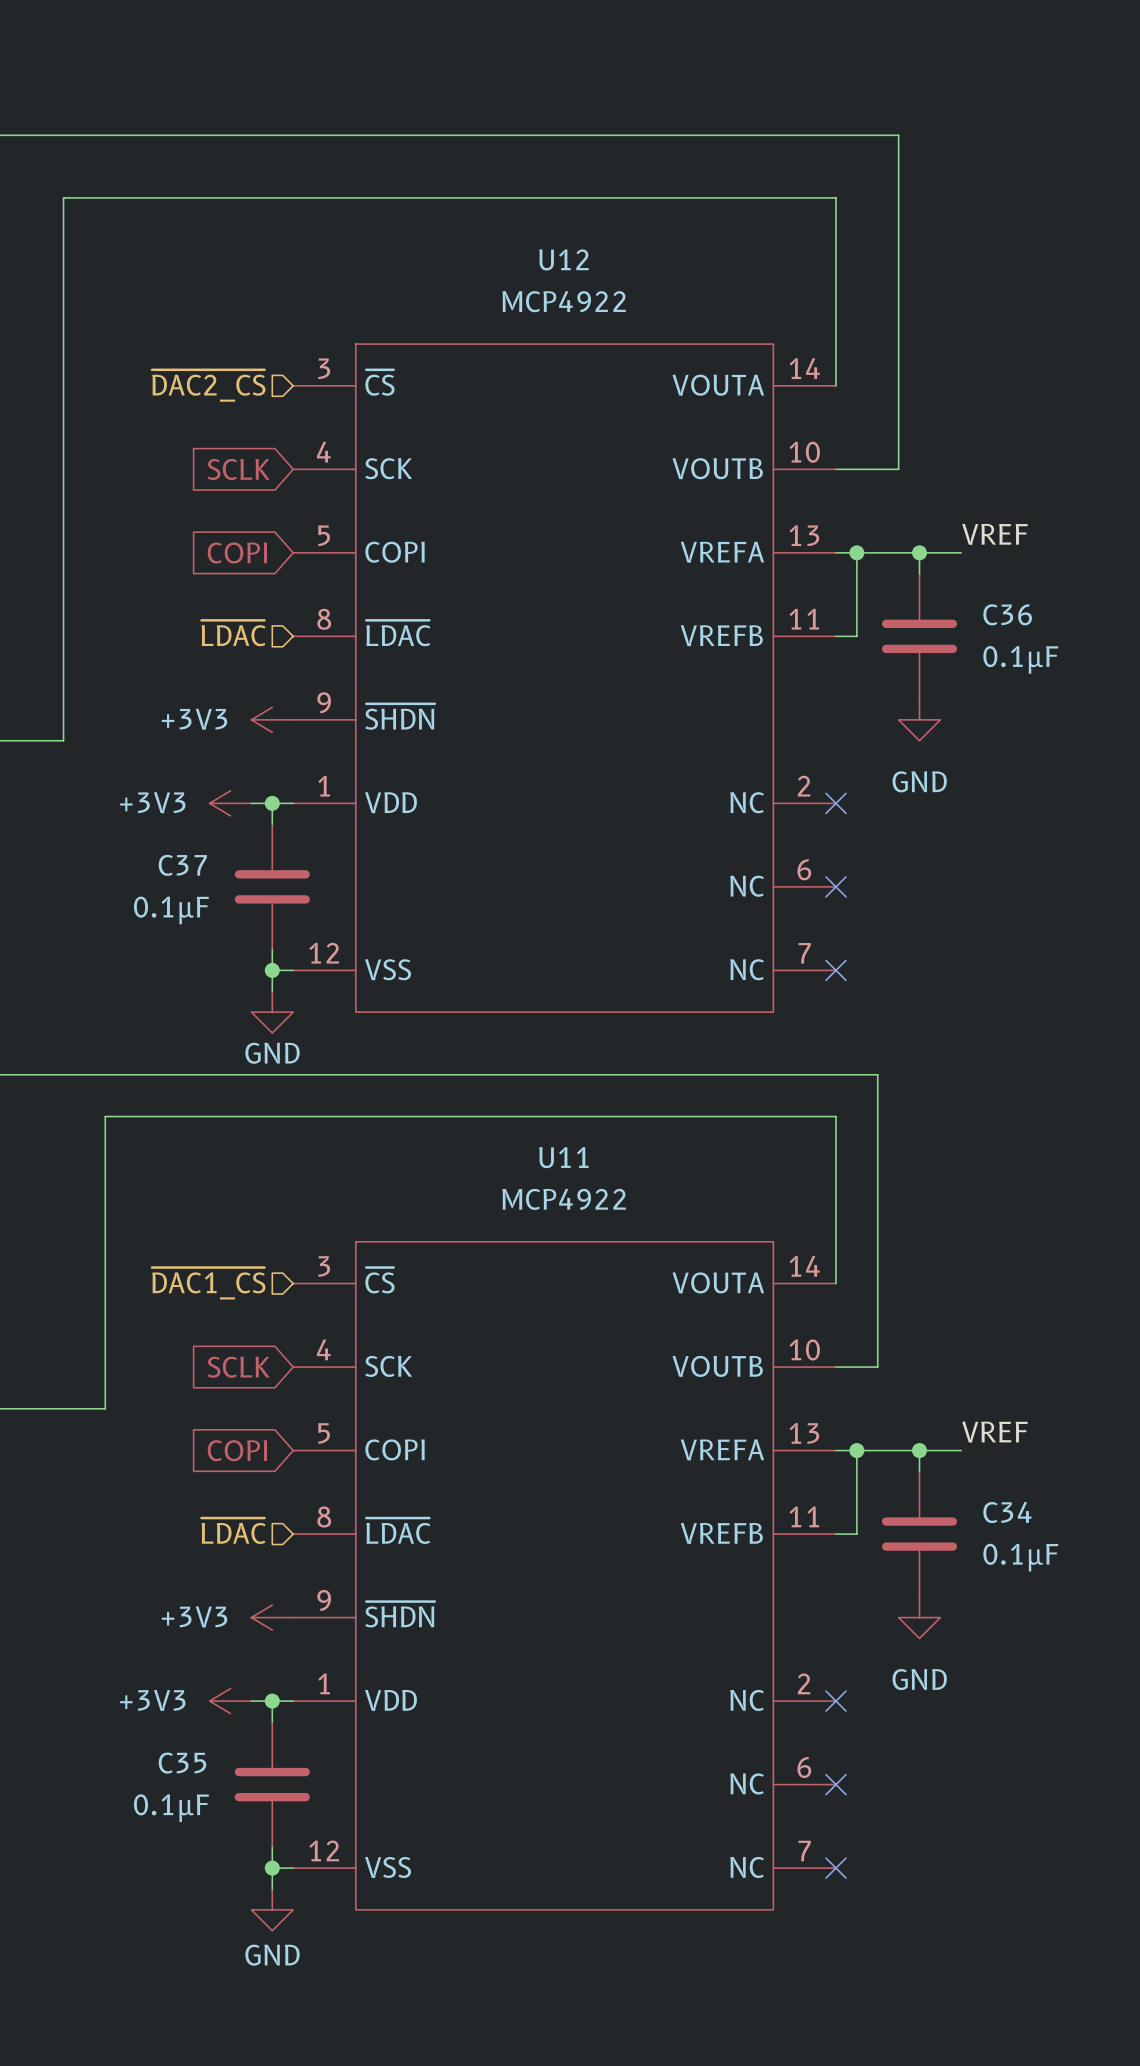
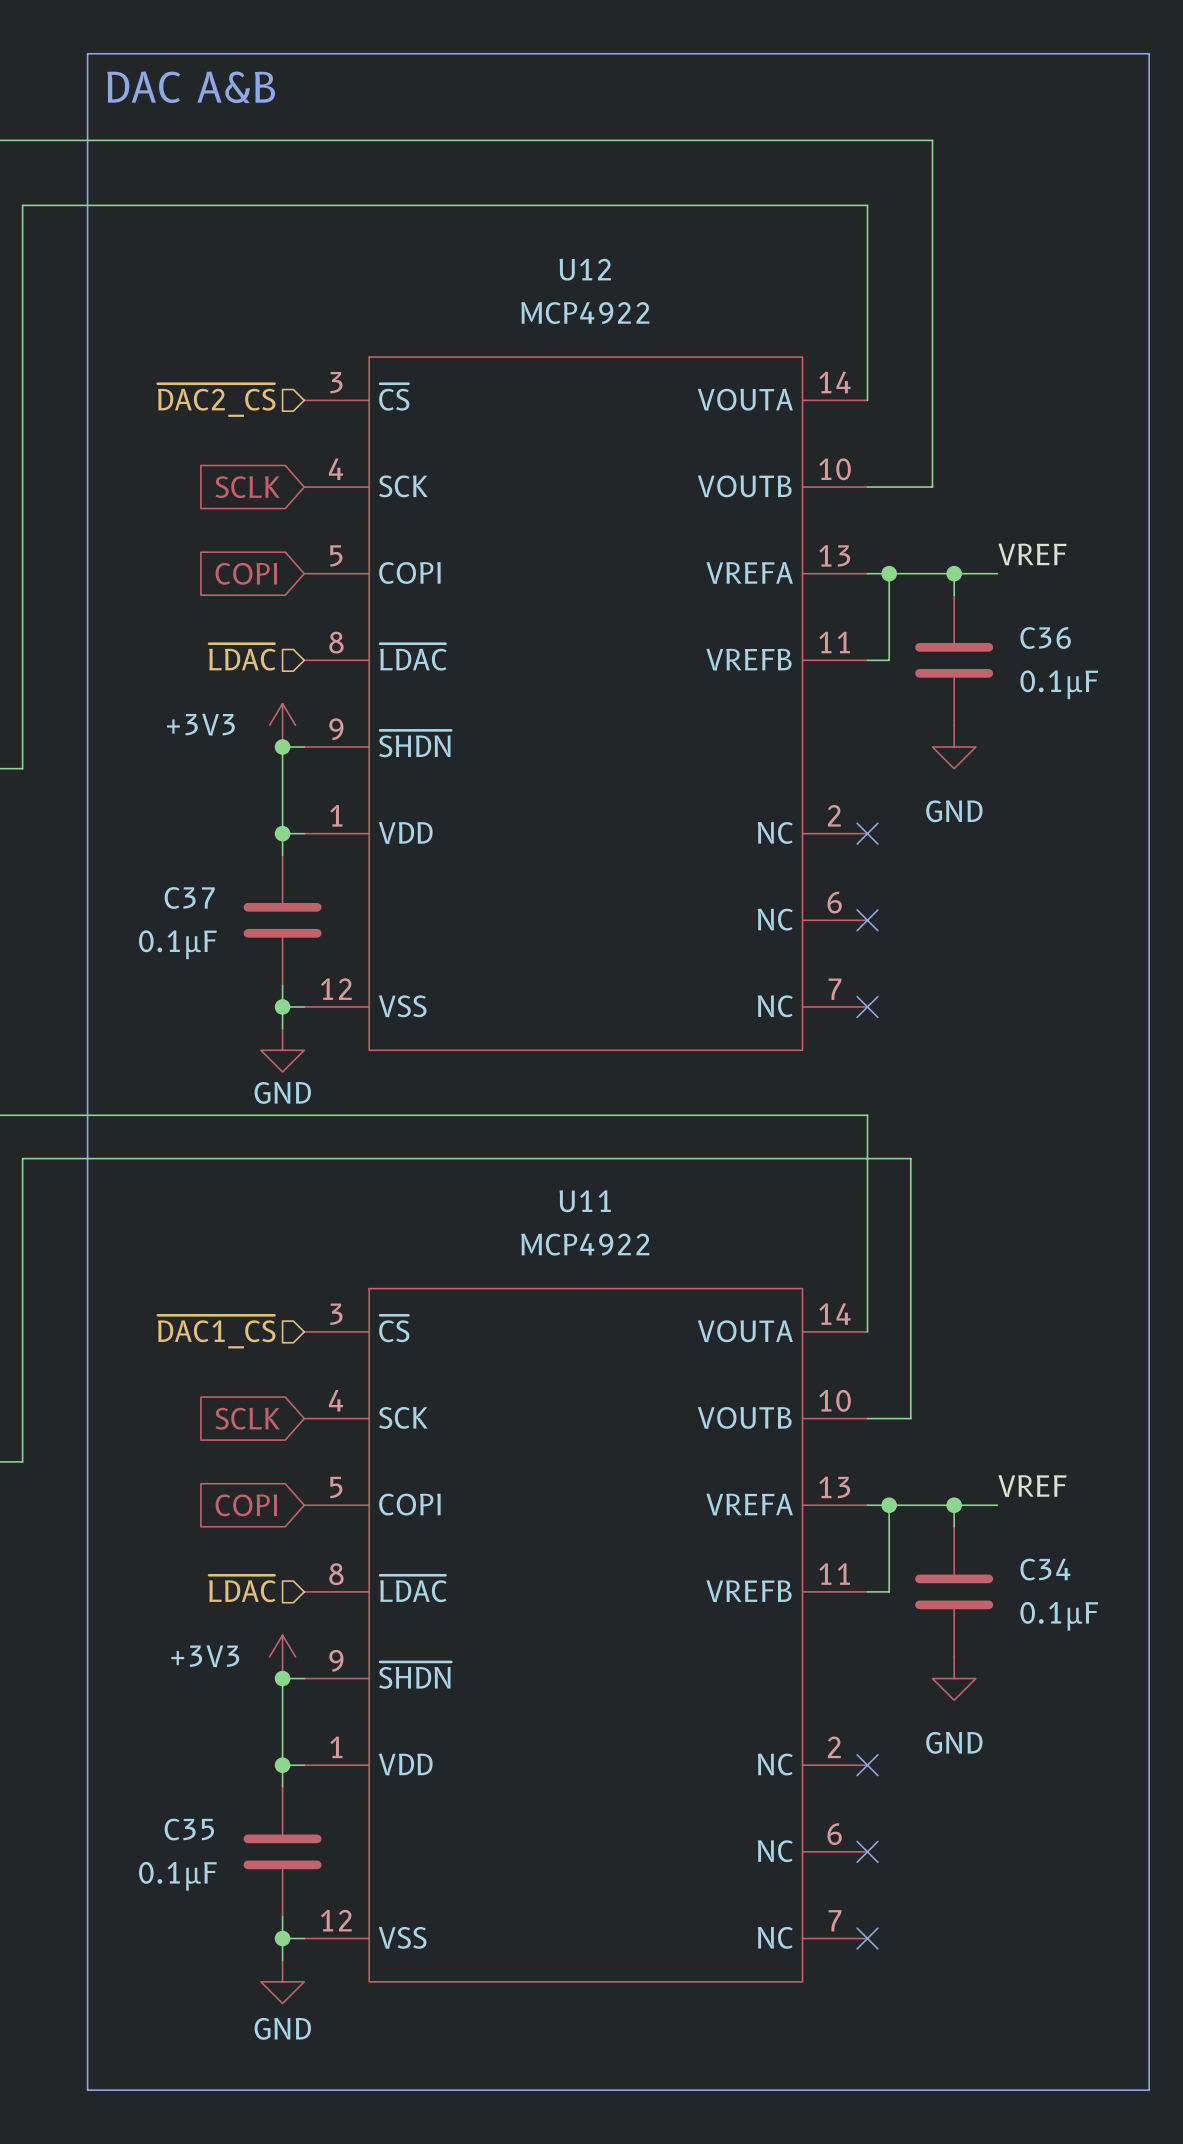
line: none -> (87, 53) (1149, 53) (1149, 2090) (87, 2090) (87, 53)
text: none -> DAC A&B (191, 87)
wire: (63, 197) (63, 740) (21, 740) -> (65, 205) (22, 205) (22, 768)
power symbol rotation: 0° (272, 719) -> 90° clockwise (282, 725)
junction: none -> (282, 747)
power symbol: +3V3 (230, 803) -> none
wire: (251, 803) (272, 803) -> (304, 747) (282, 747) (282, 833)
wire: (835, 1074) (877, 1074) (877, 1116) -> (867, 1115) (867, 1158) (910, 1158)
wire: (105, 1116) (105, 1408) (21, 1408) -> (109, 1158) (22, 1158) (22, 1461)
power symbol rotation: 0° (272, 1617) -> 90° clockwise (282, 1656)
junction: none -> (282, 1678)
power symbol: +3V3 (230, 1701) -> none
wire: (251, 1701) (272, 1701) -> (304, 1678) (282, 1678) (282, 1765)

